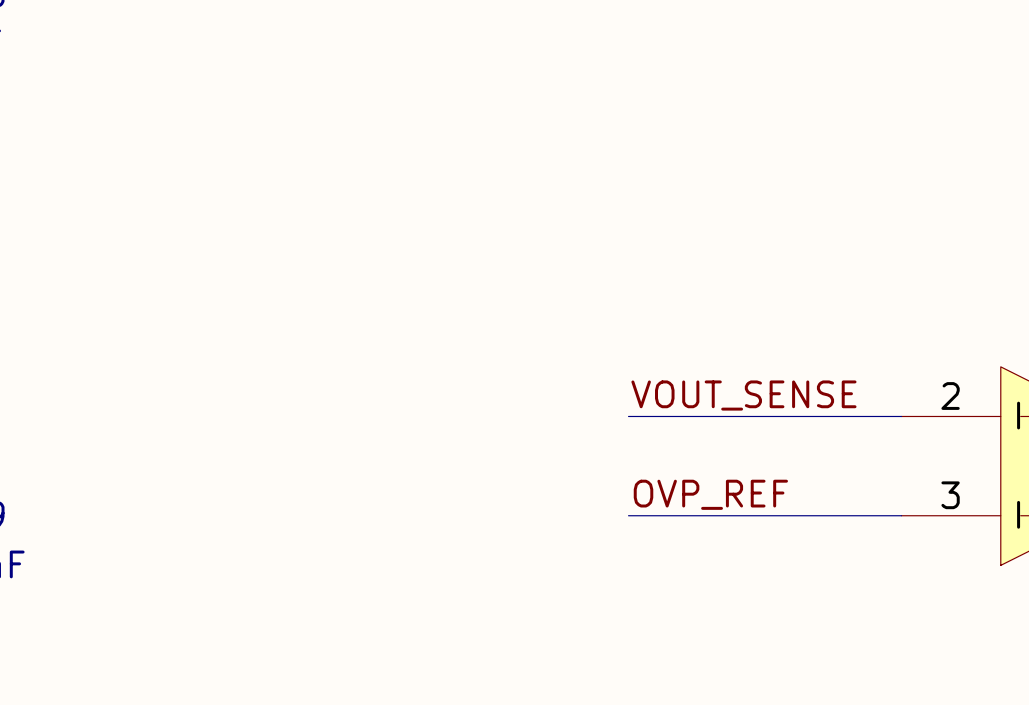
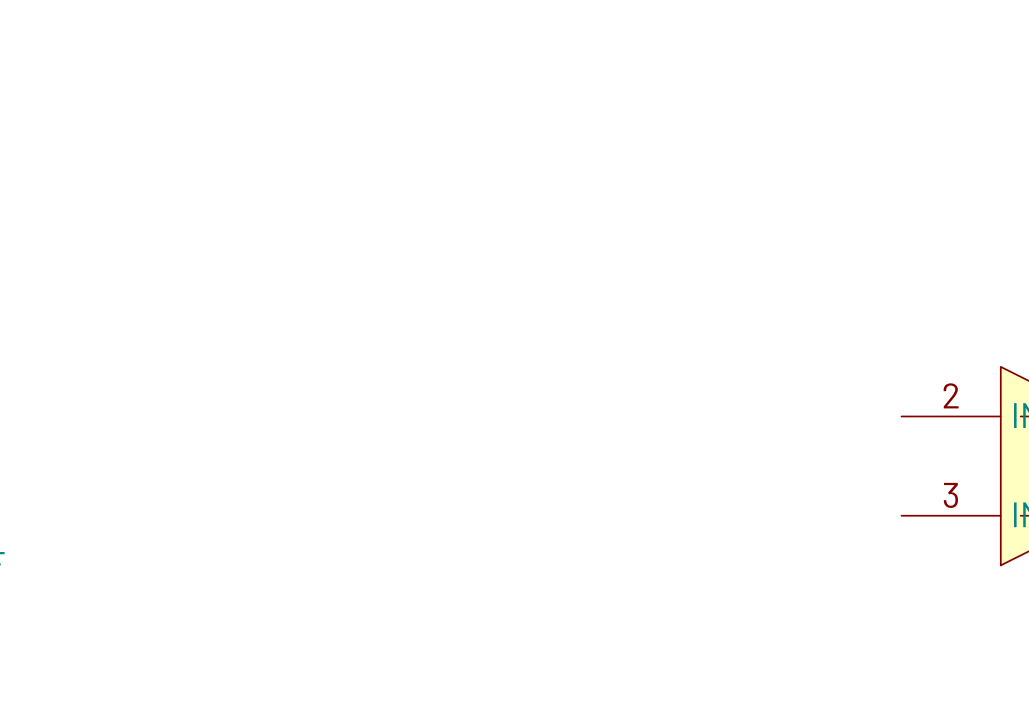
label: VOUT_SENSE (743, 395) -> none
wire: (628, 416) (901, 416) -> none
label: OVP_REF (710, 494) -> none
wire: (628, 515) (901, 515) -> none

